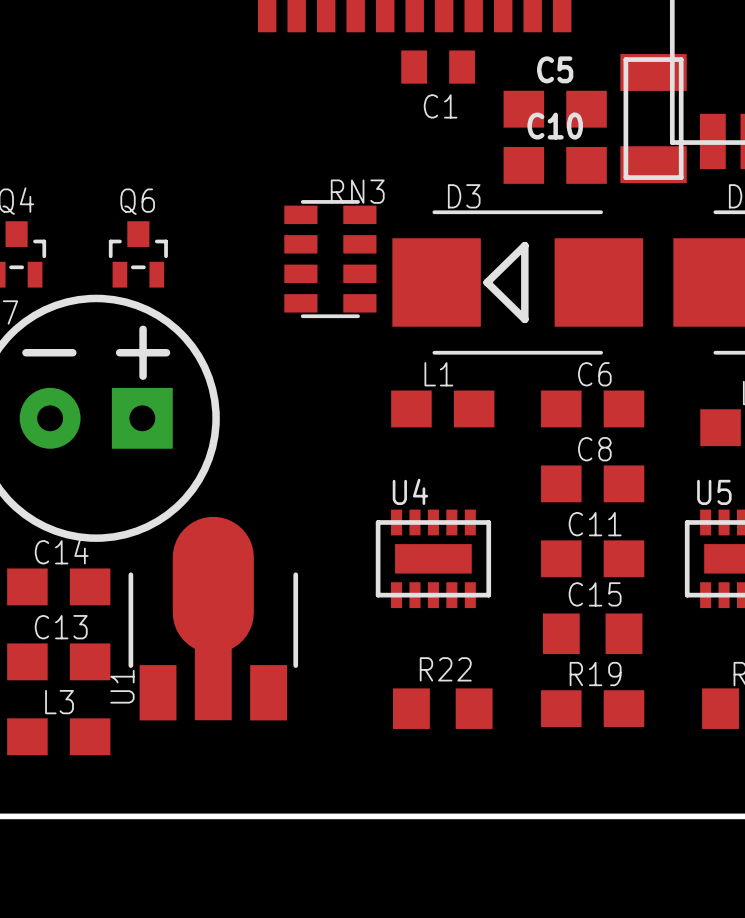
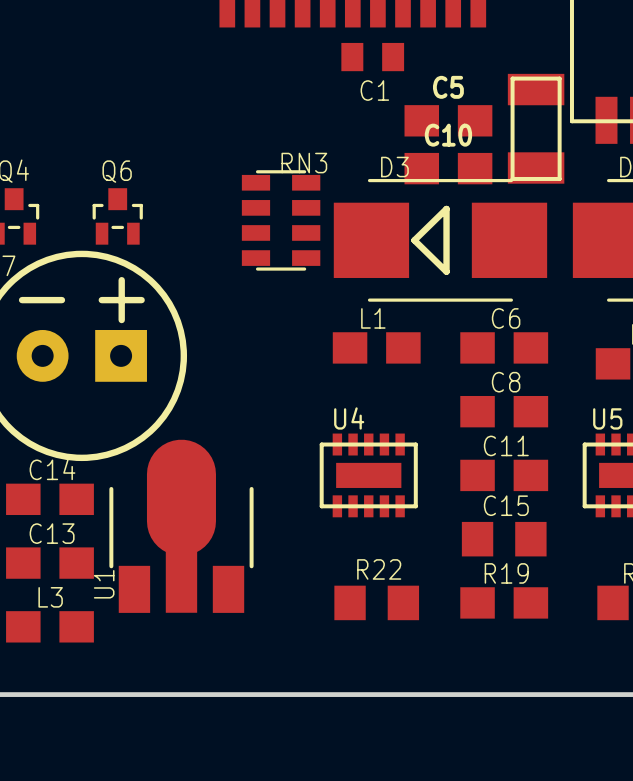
C5 position: (555, 109) -> (448, 120)
part position: (653, 118) -> (536, 128)
C10 position: (555, 165) -> (448, 168)

